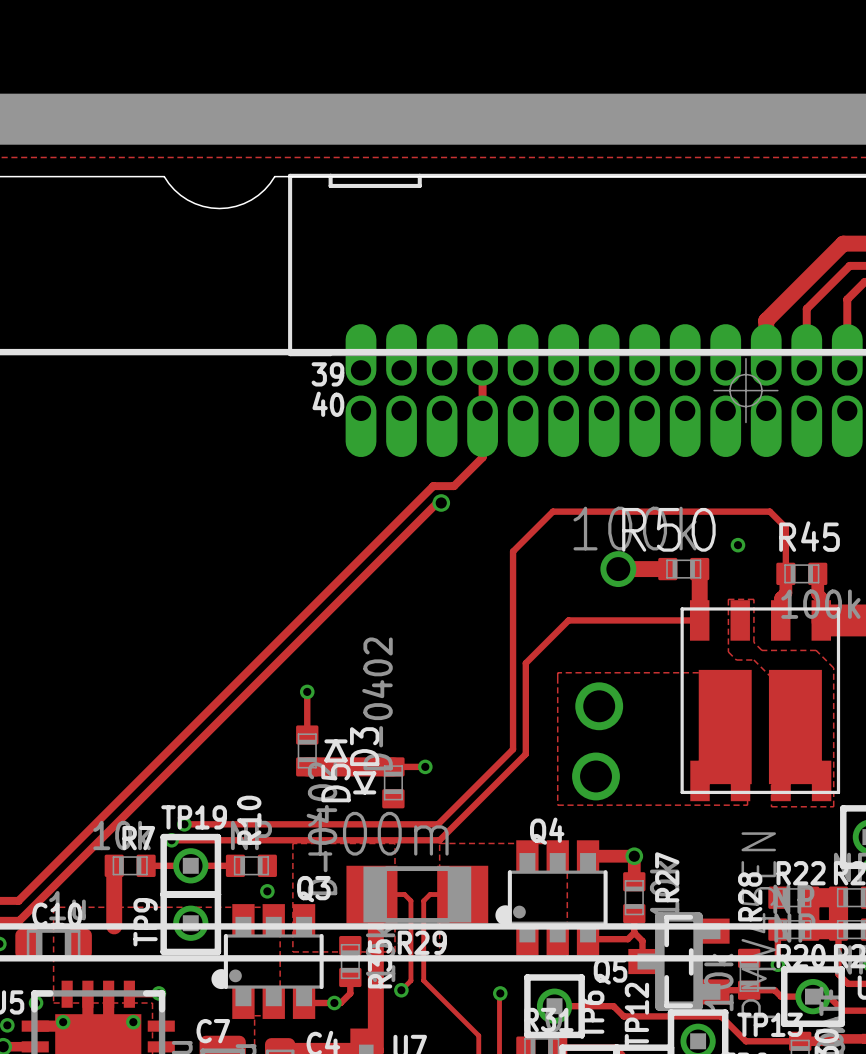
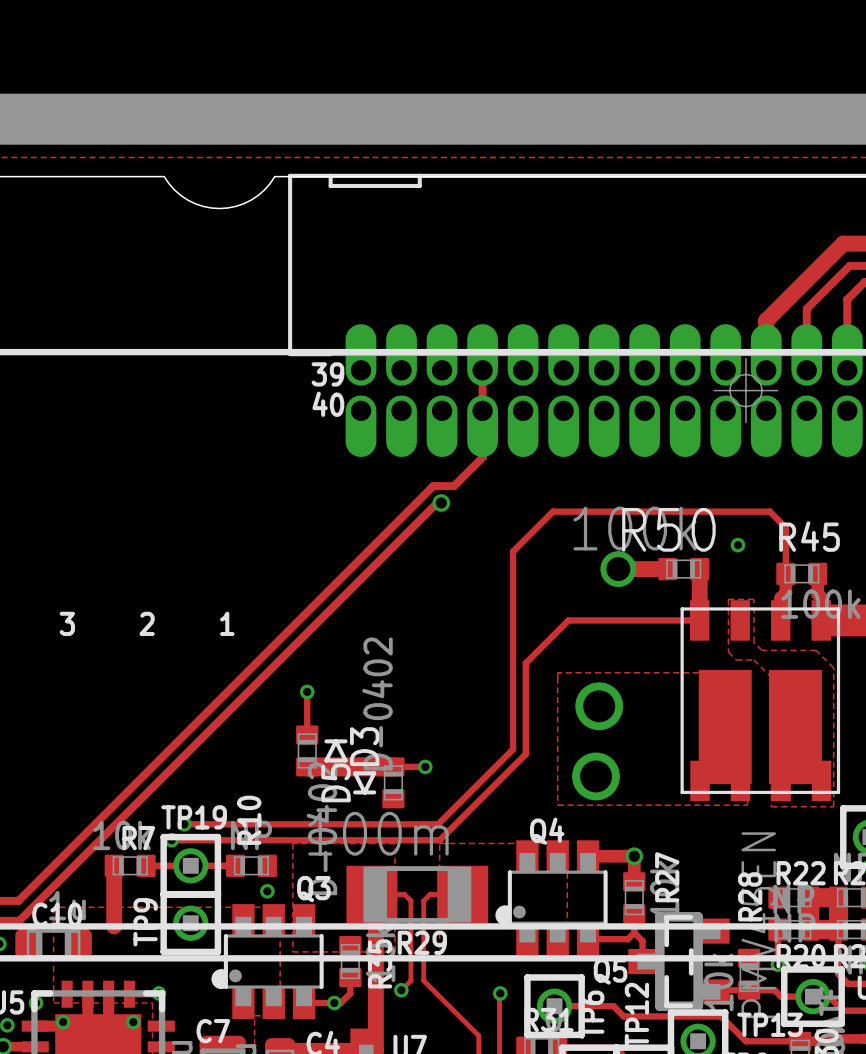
text: none -> 3 (67, 623)
text: none -> 2 (147, 623)
text: none -> 1 (227, 623)

